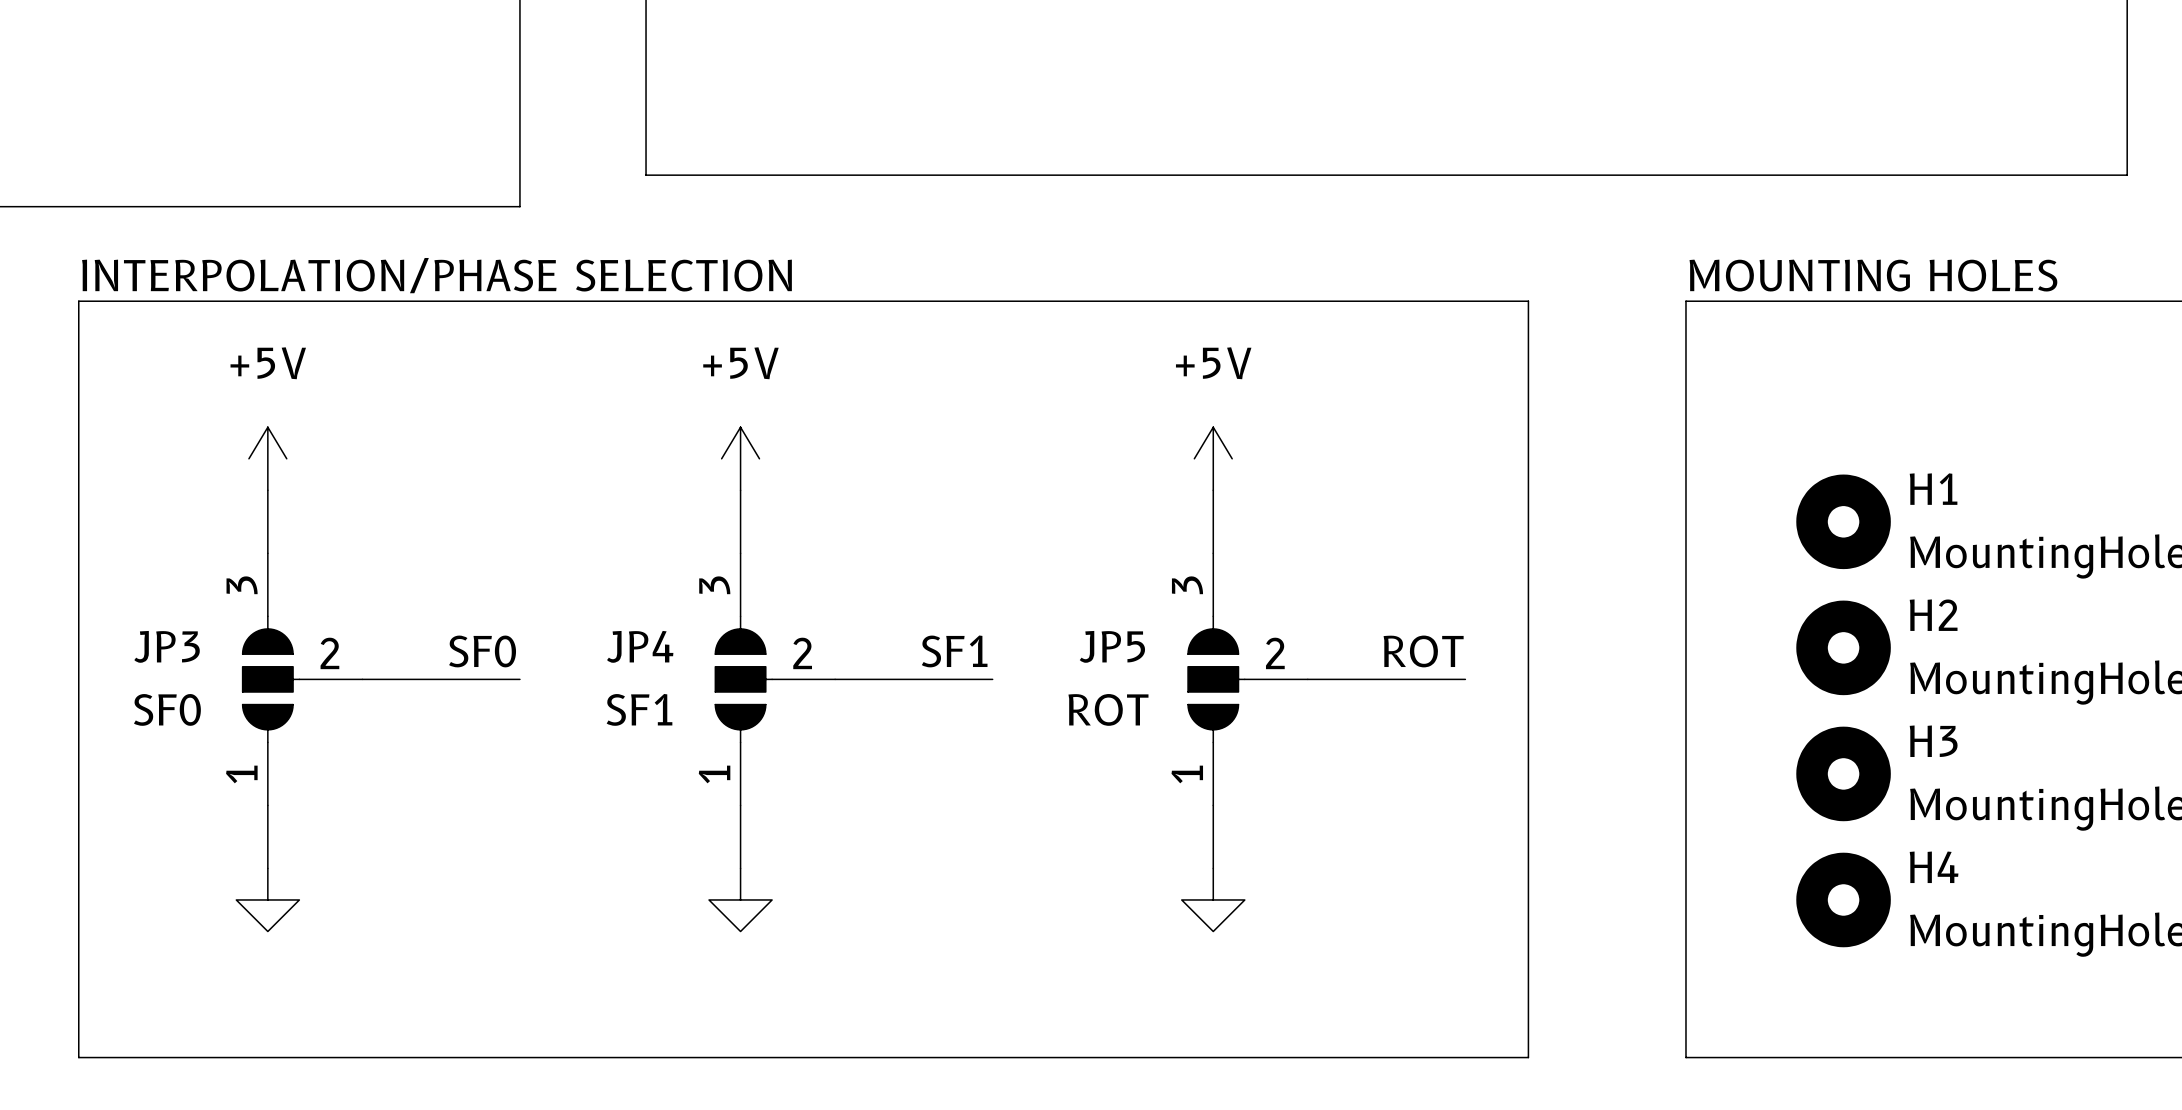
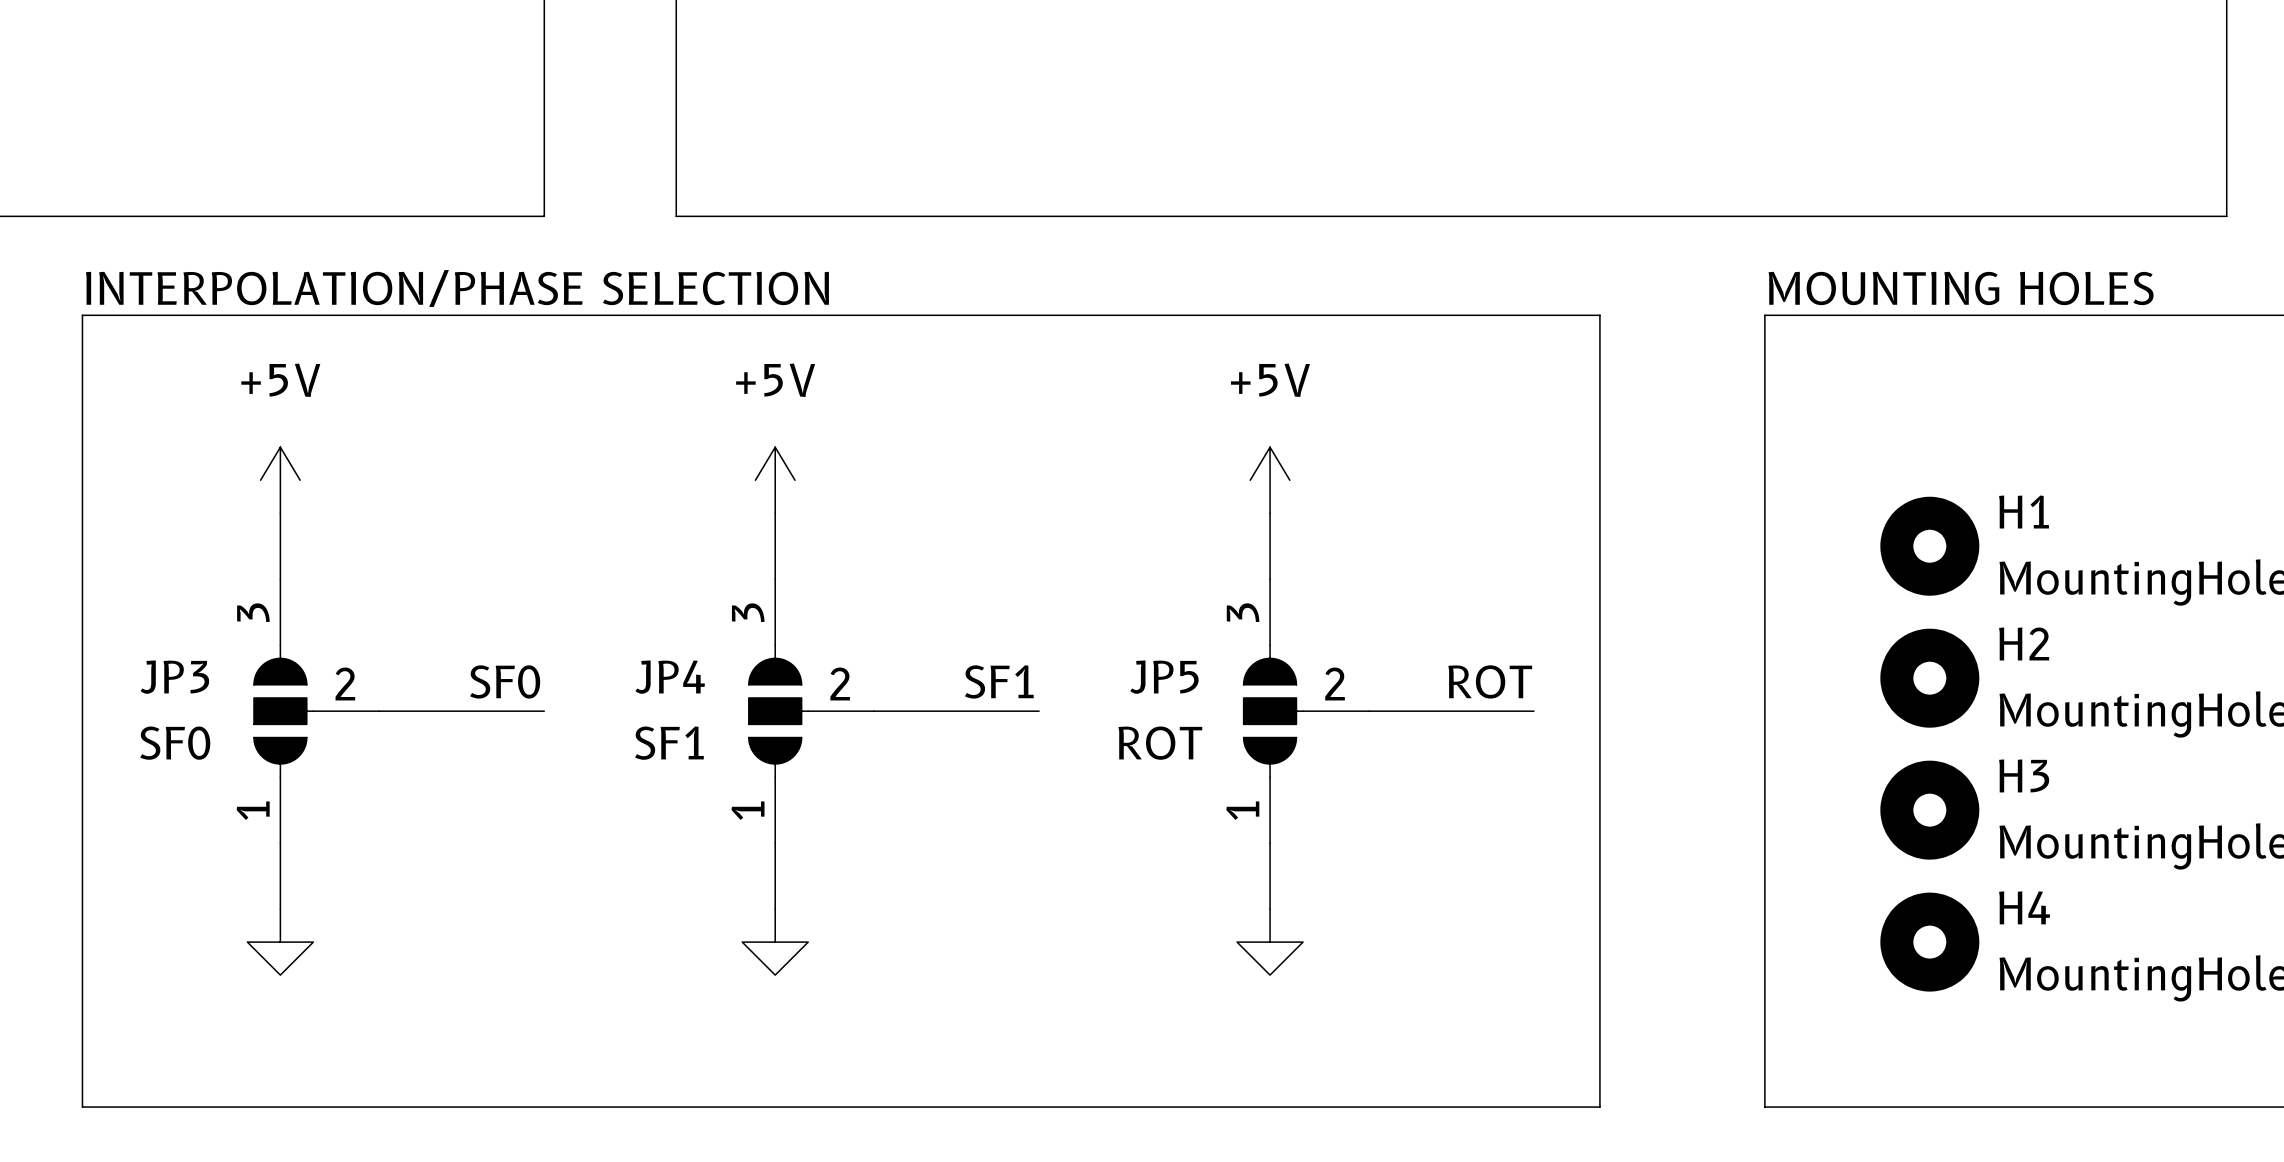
line: (646, 175) (2127, 175) -> (676, 183) (676, 216) (2226, 216) (2226, 183)

